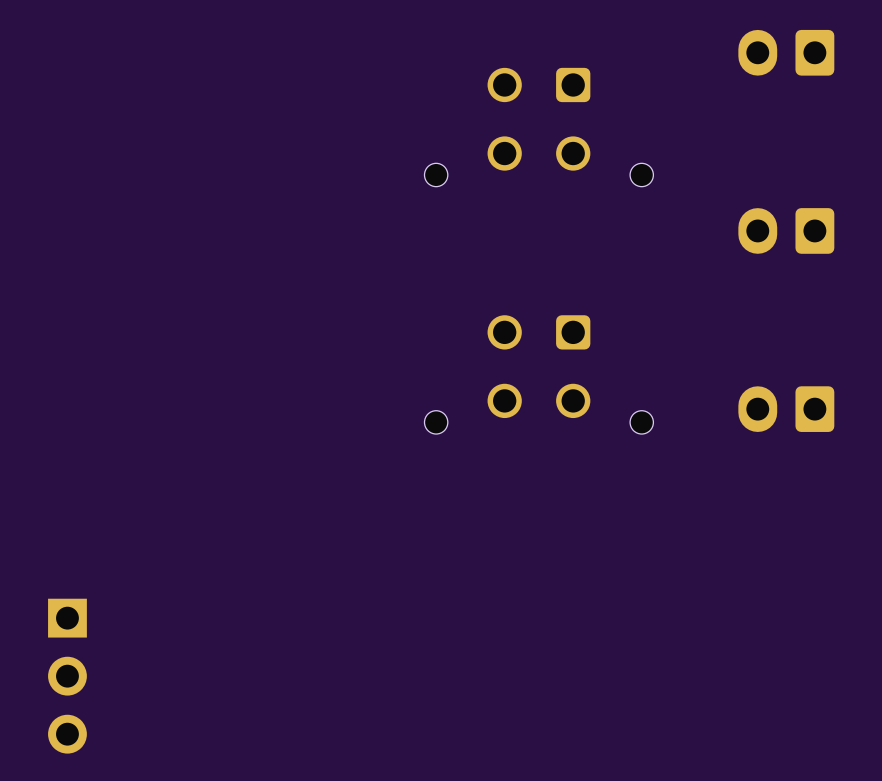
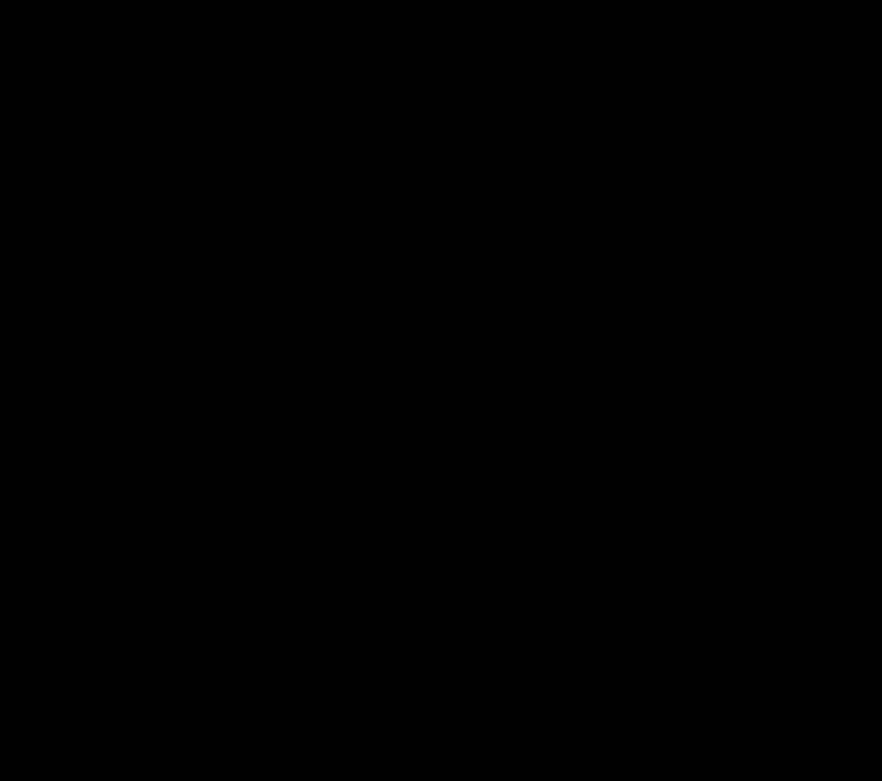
part: (786, 52) -> none
part: (538, 127) -> none
part: (786, 230) -> none
part: (538, 374) -> none
part: (786, 409) -> none
part: (67, 676) -> none

